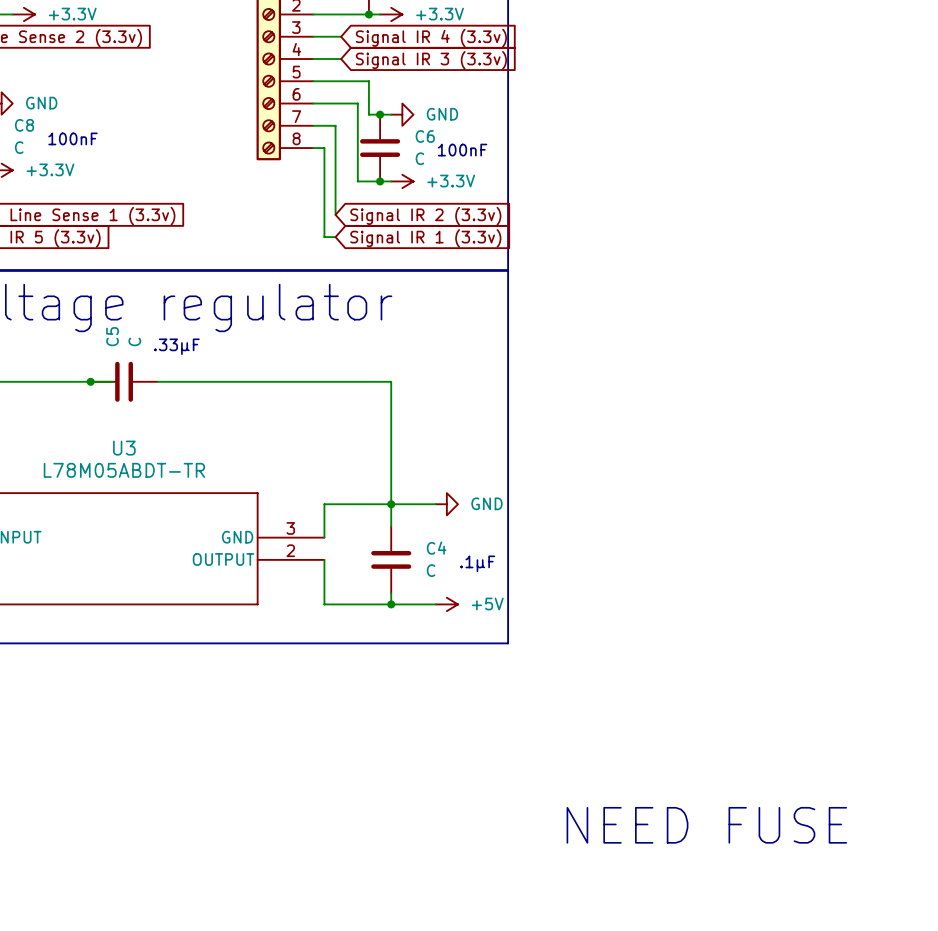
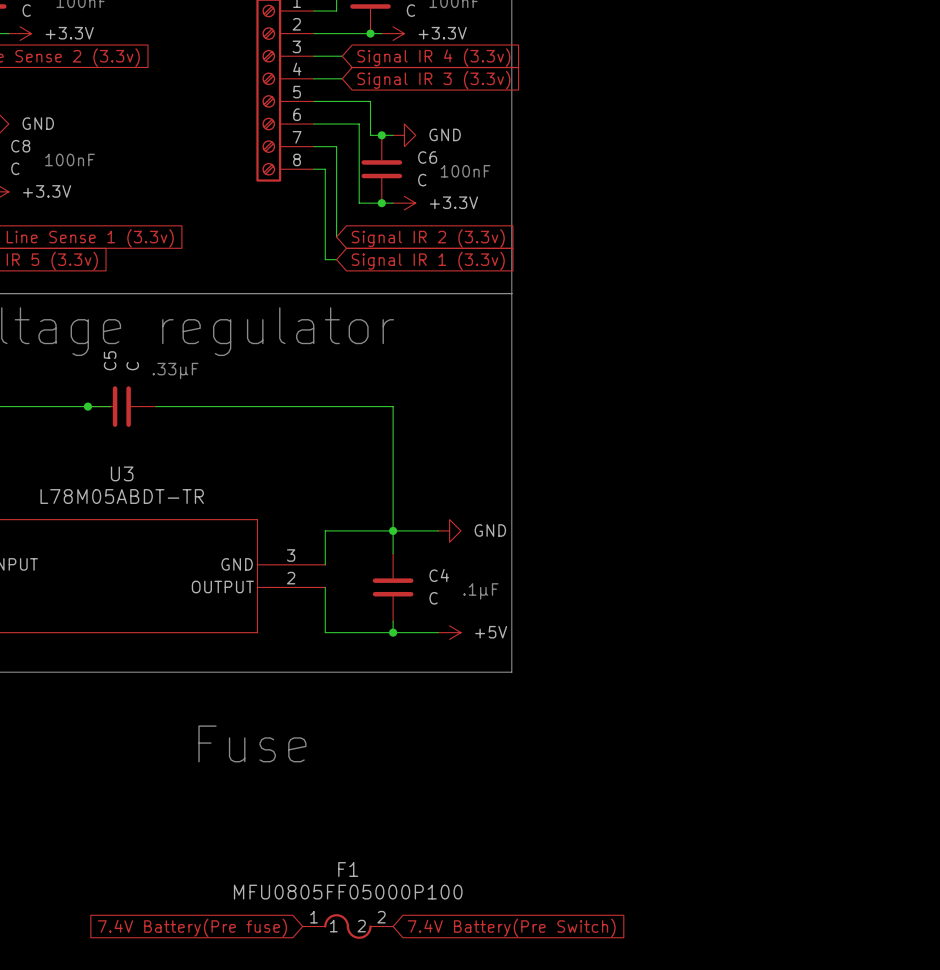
text: none -> Fuse (252, 743)
text: NEED FUSE (706, 825) -> none
F1: none -> MFU0805FF05000P100 (347, 926)
global label: none -> 7.4V Battery(Pre fuse) (192, 927)
global label: none -> 7.4V Battery(Pre Switch) (511, 927)

